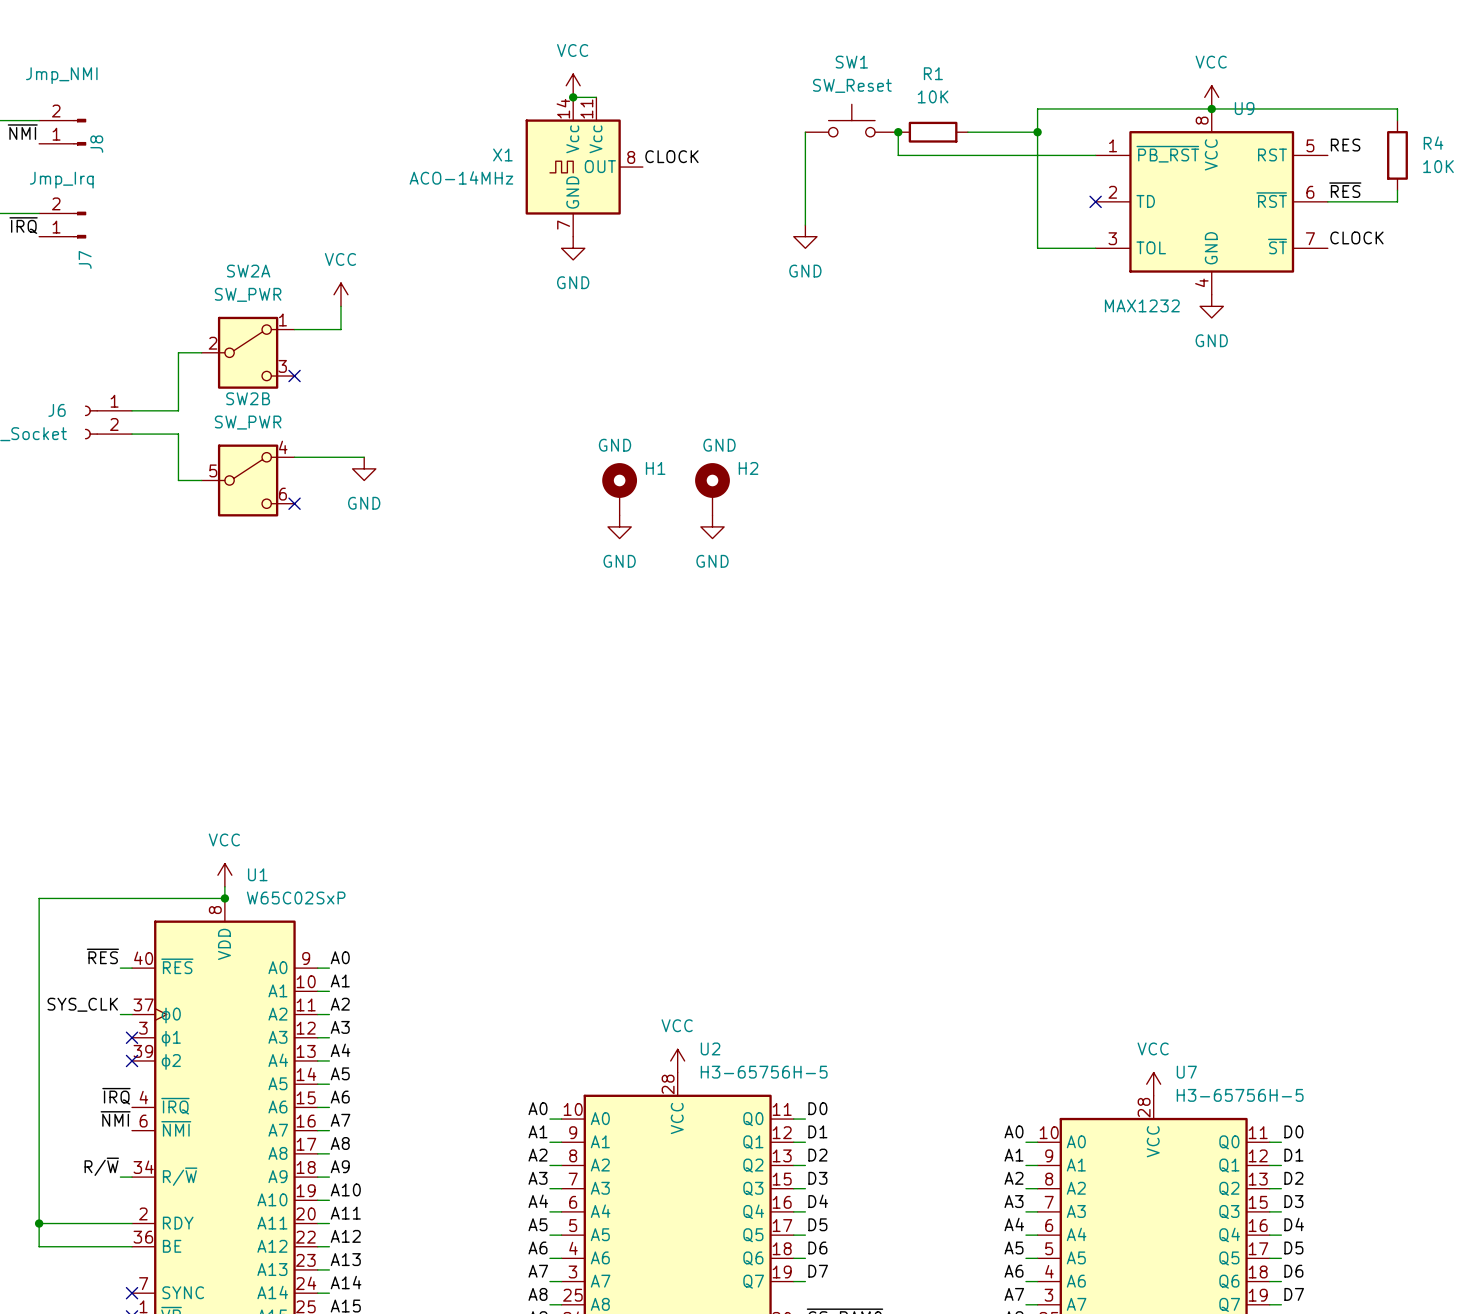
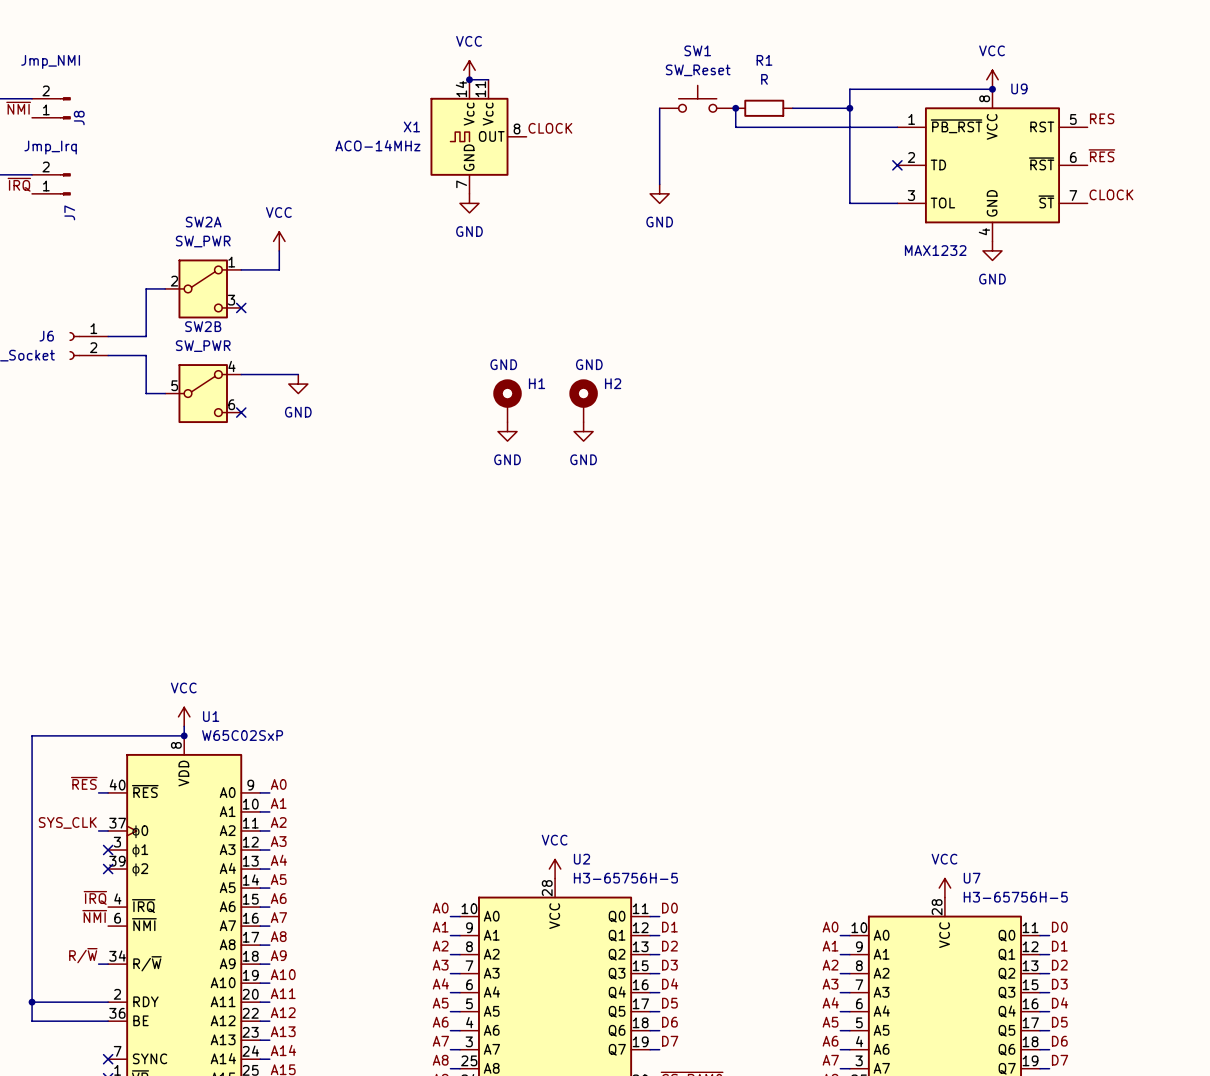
R1 value: 10K (933, 96) -> R (764, 79)
wire: (1211, 108) (1397, 108) (1397, 120) -> none
R4: 10K (1397, 155) -> none
wire: (1397, 190) (1397, 201) (1327, 201) -> none

